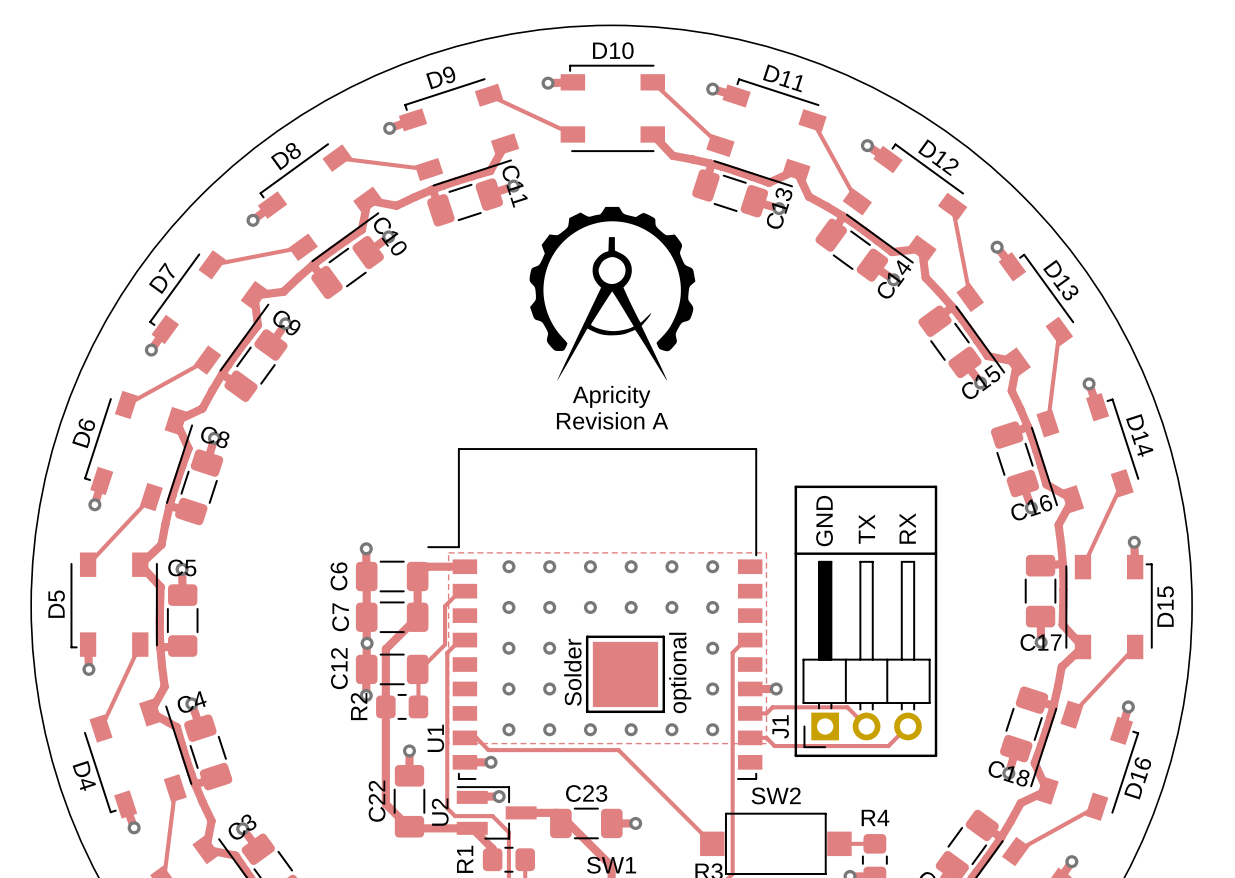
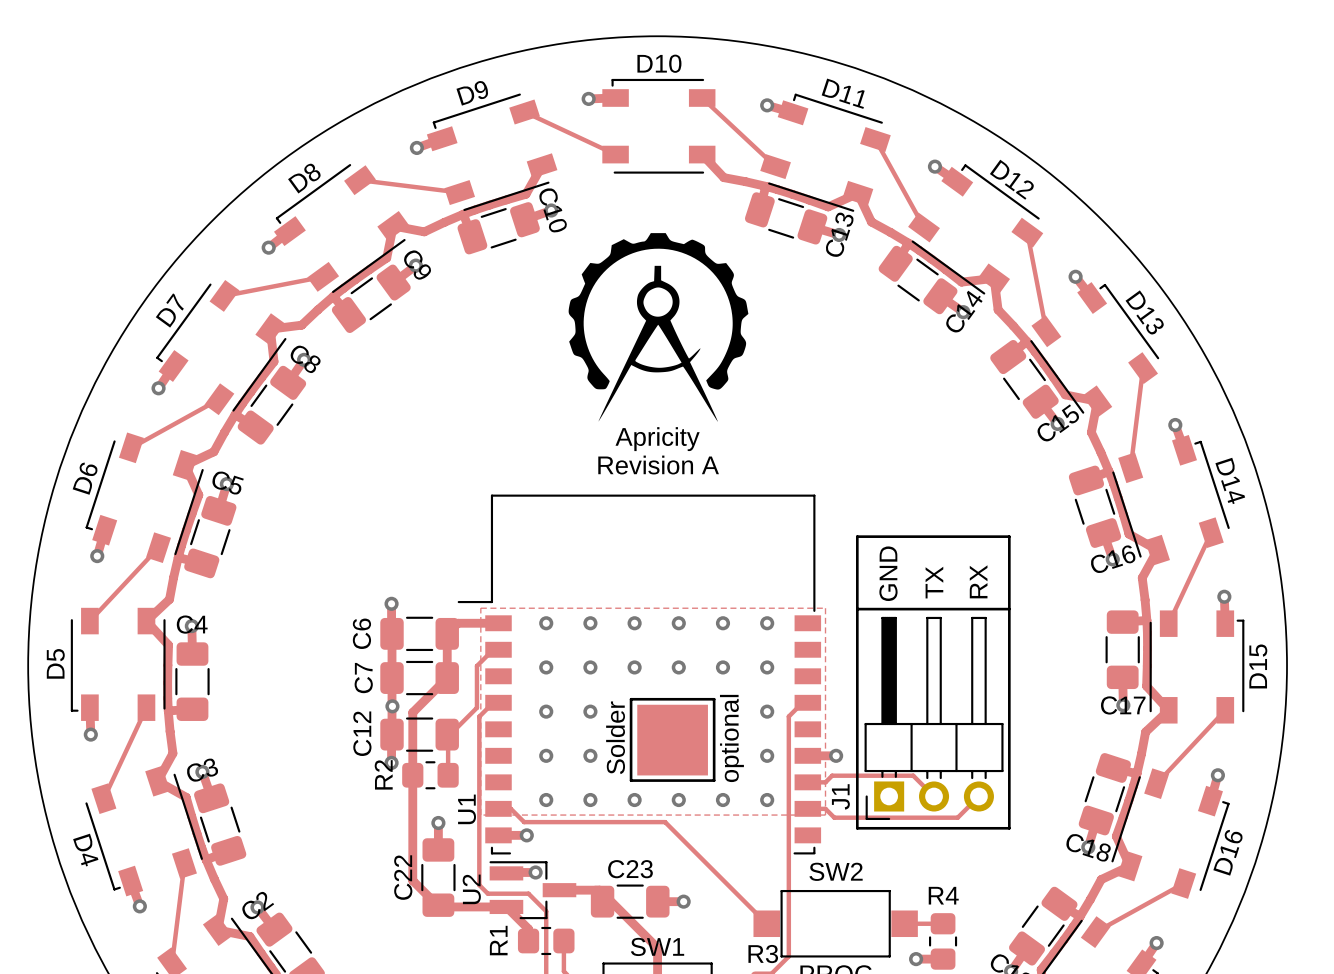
C11 name: C11 (515, 186) -> C10 (553, 210)
C10 name: C10 (390, 236) -> C9 (417, 264)
C9 name: C9 (286, 323) -> C8 (305, 359)
C8 name: C8 (215, 437) -> C5 (227, 482)
C5 name: C5 (182, 567) -> C4 (192, 624)
C4 name: C4 (191, 702) -> C3 (202, 770)
C3 name: C3 (242, 827) -> C2 (258, 905)

